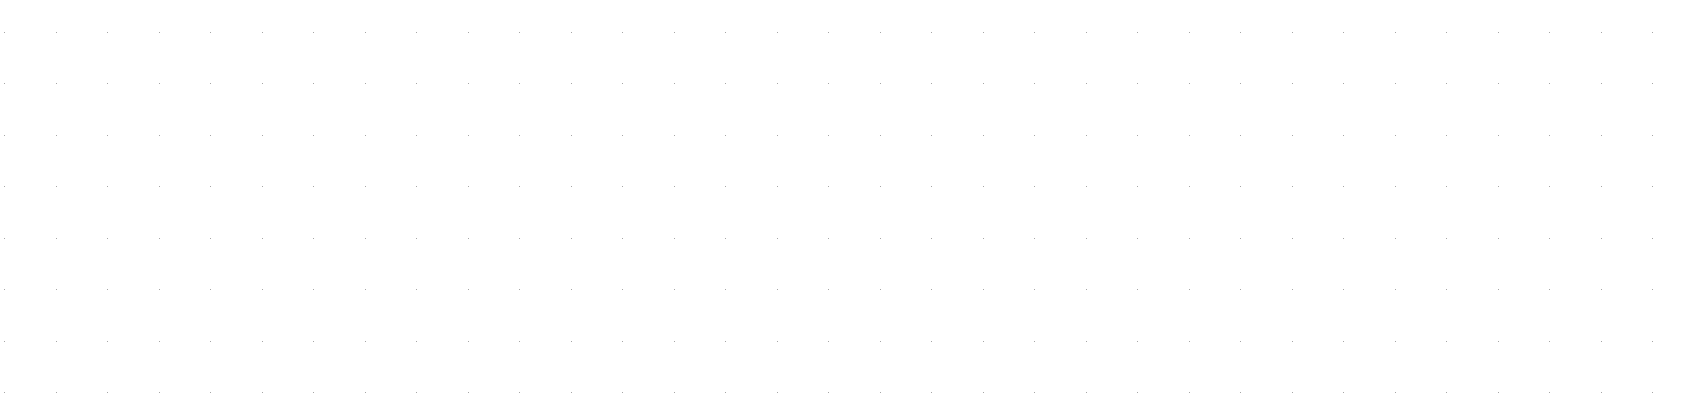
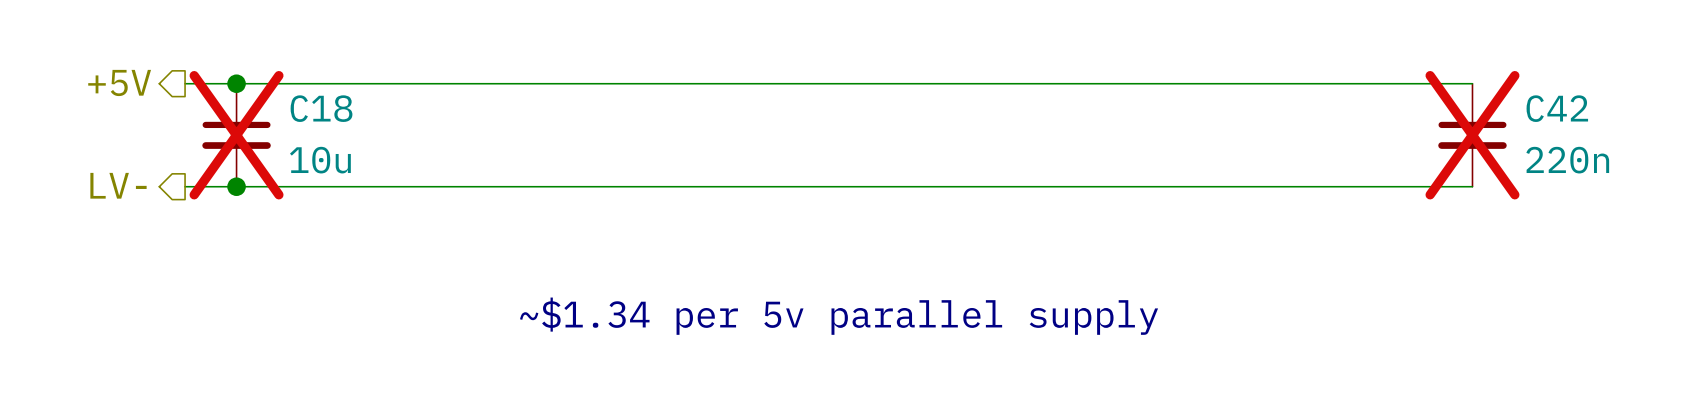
hierarchical label: none -> +5V (119, 82)
wire: none -> (185, 83) (1472, 83)
junction: none -> (236, 83)
C18: none -> 10u (236, 135)
C42: none -> 220n (1472, 135)
hierarchical label: none -> LV- (118, 185)
wire: none -> (185, 186) (1472, 186)
junction: none -> (236, 186)
text: none -> ~$1.34 per 5v parallel supply (839, 316)

